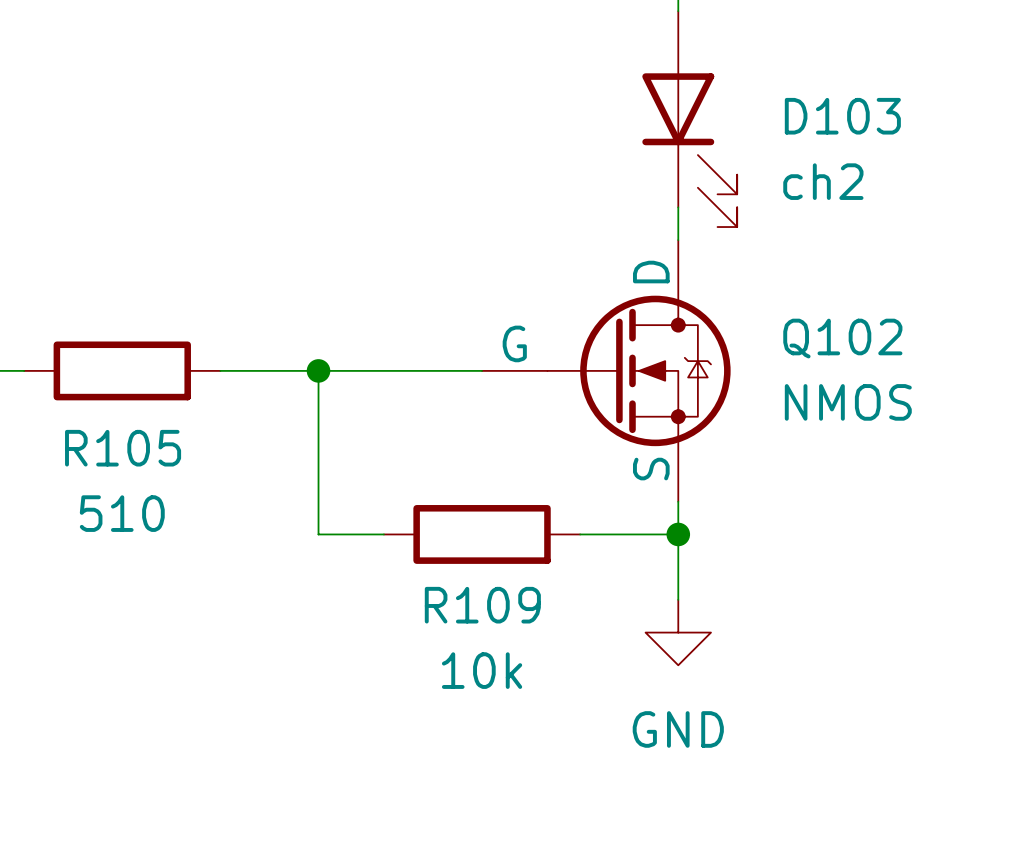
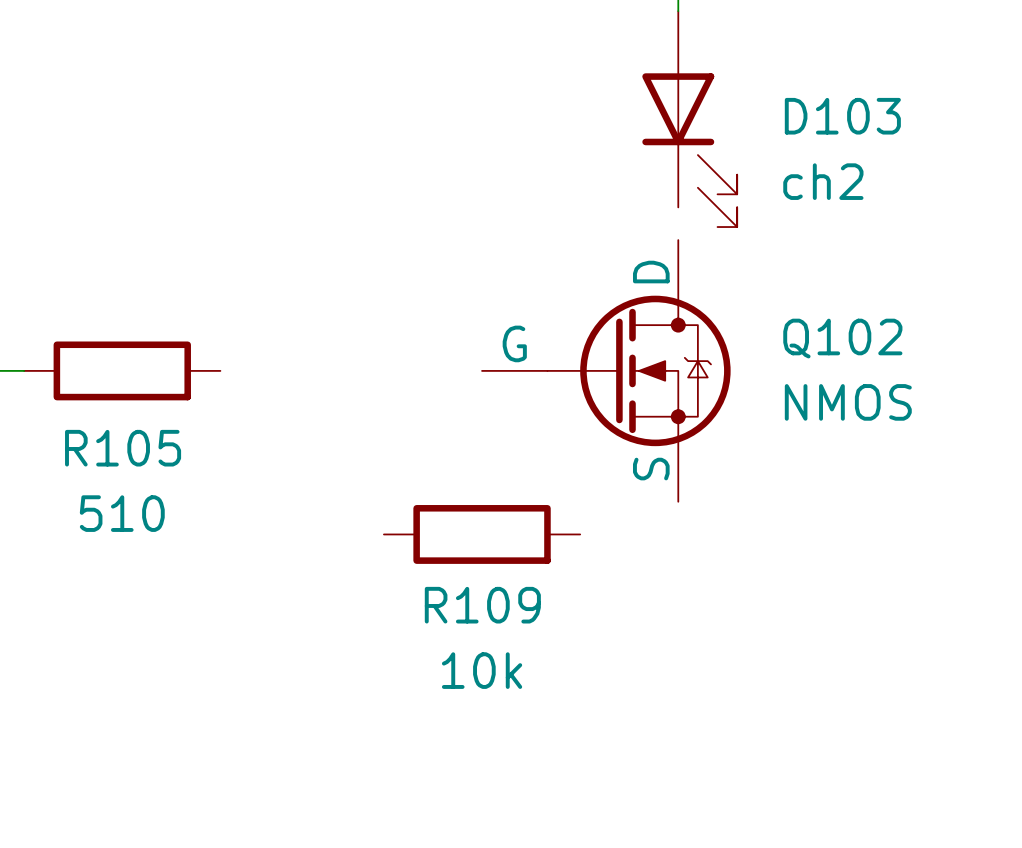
wire: (678, 207) (678, 240) -> none
wire: (220, 370) (482, 370) -> none
wire: (318, 370) (318, 534) (383, 534) -> none
junction: (318, 370) -> none
wire: (678, 501) (678, 599) -> none
wire: (580, 534) (678, 534) -> none
junction: (678, 534) -> none
power symbol: GND (678, 632) -> none

